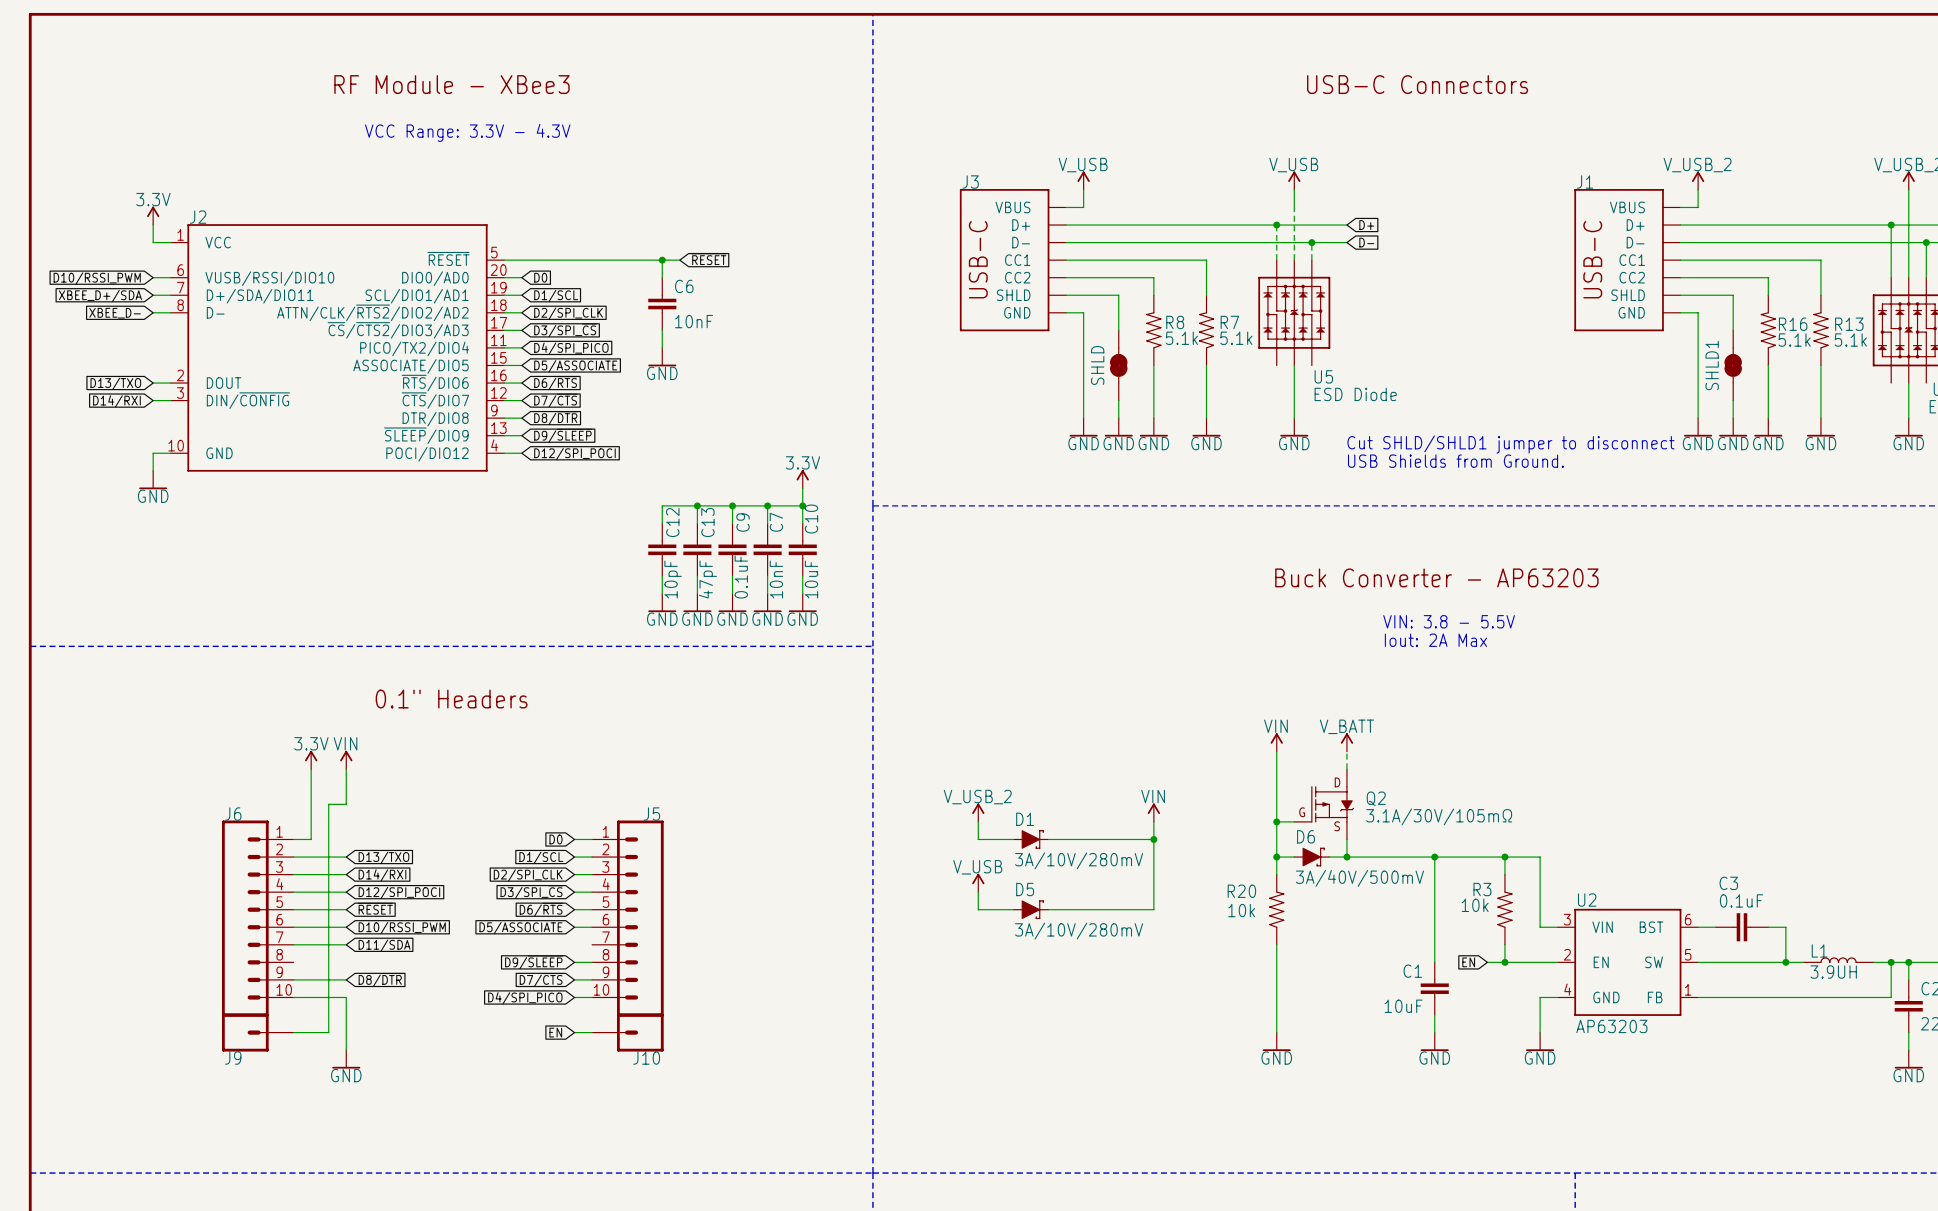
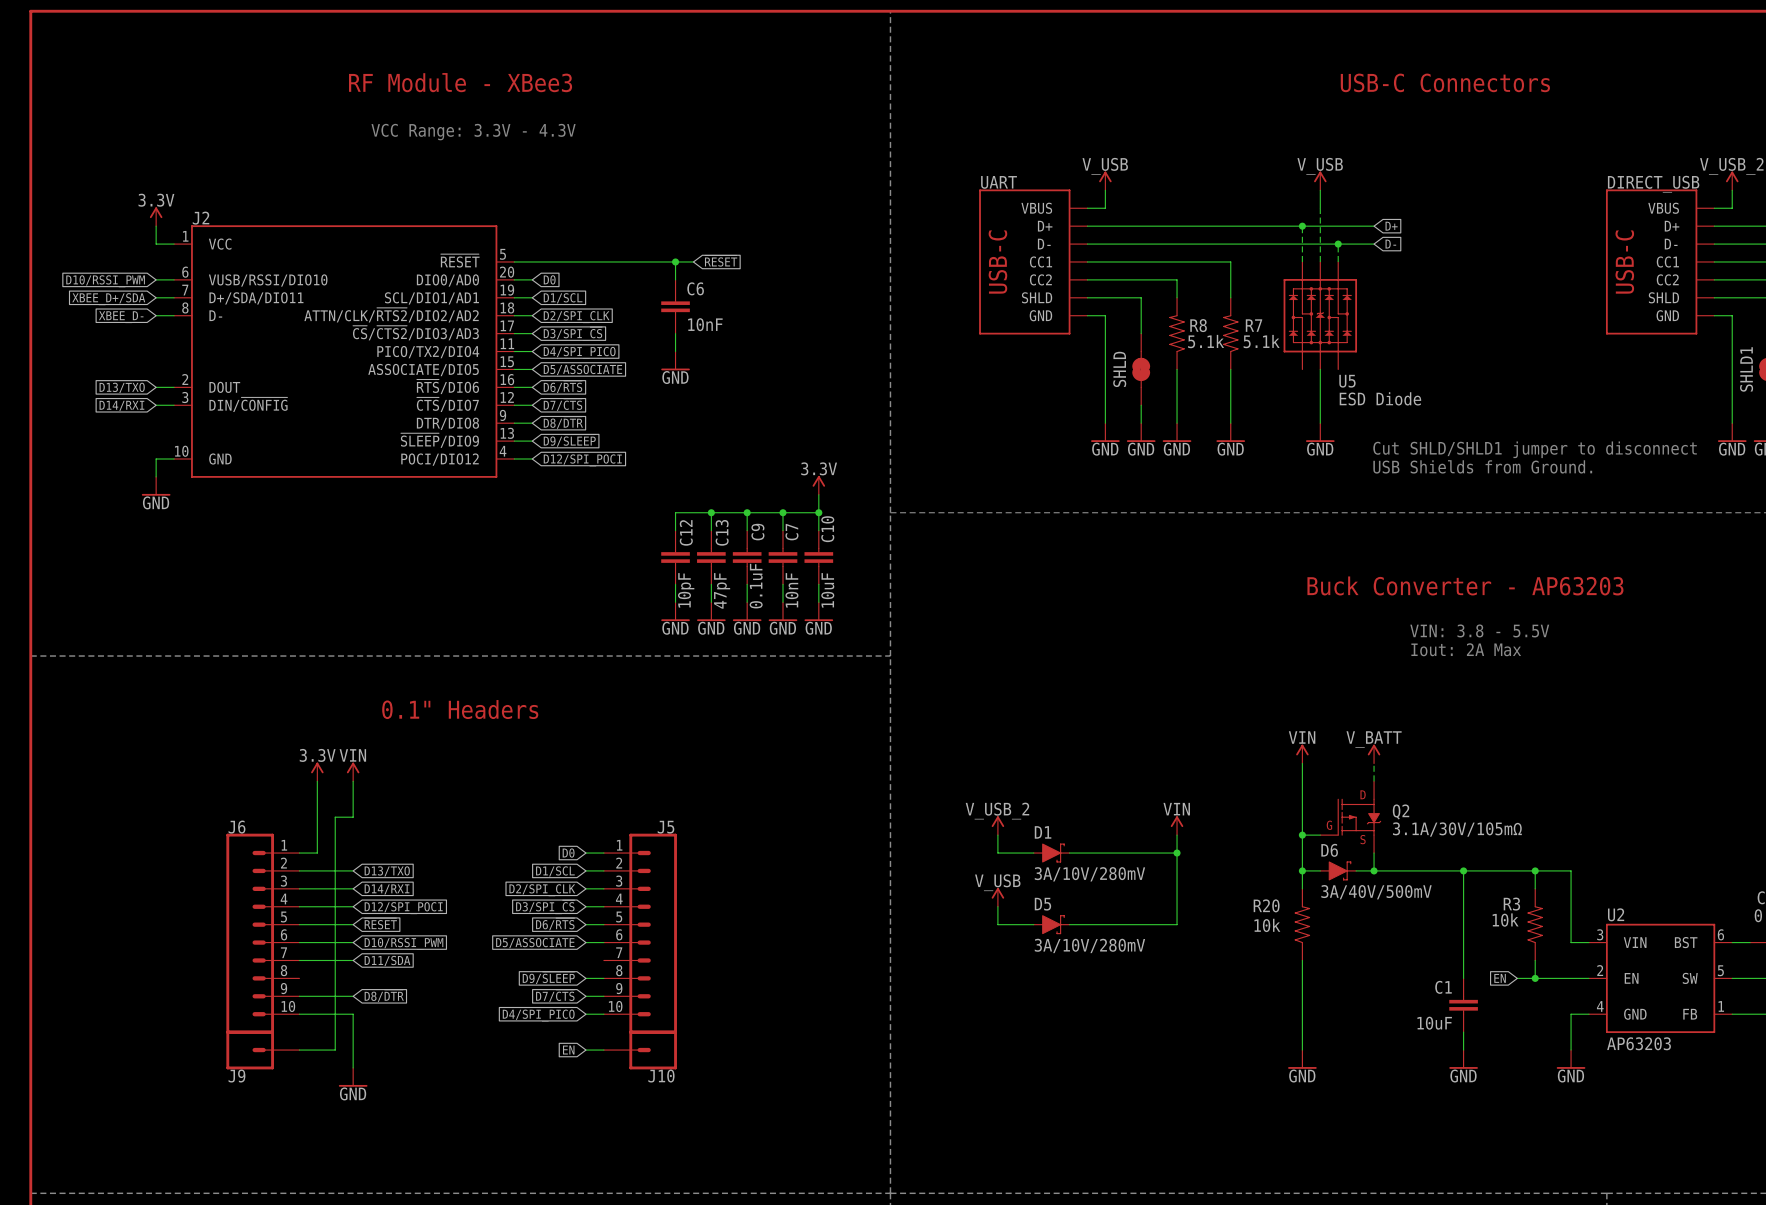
J3 name: J3 (970, 182) -> UART (999, 182)
J1 name: J1 (1585, 182) -> DIRECT_USB (1653, 184)

